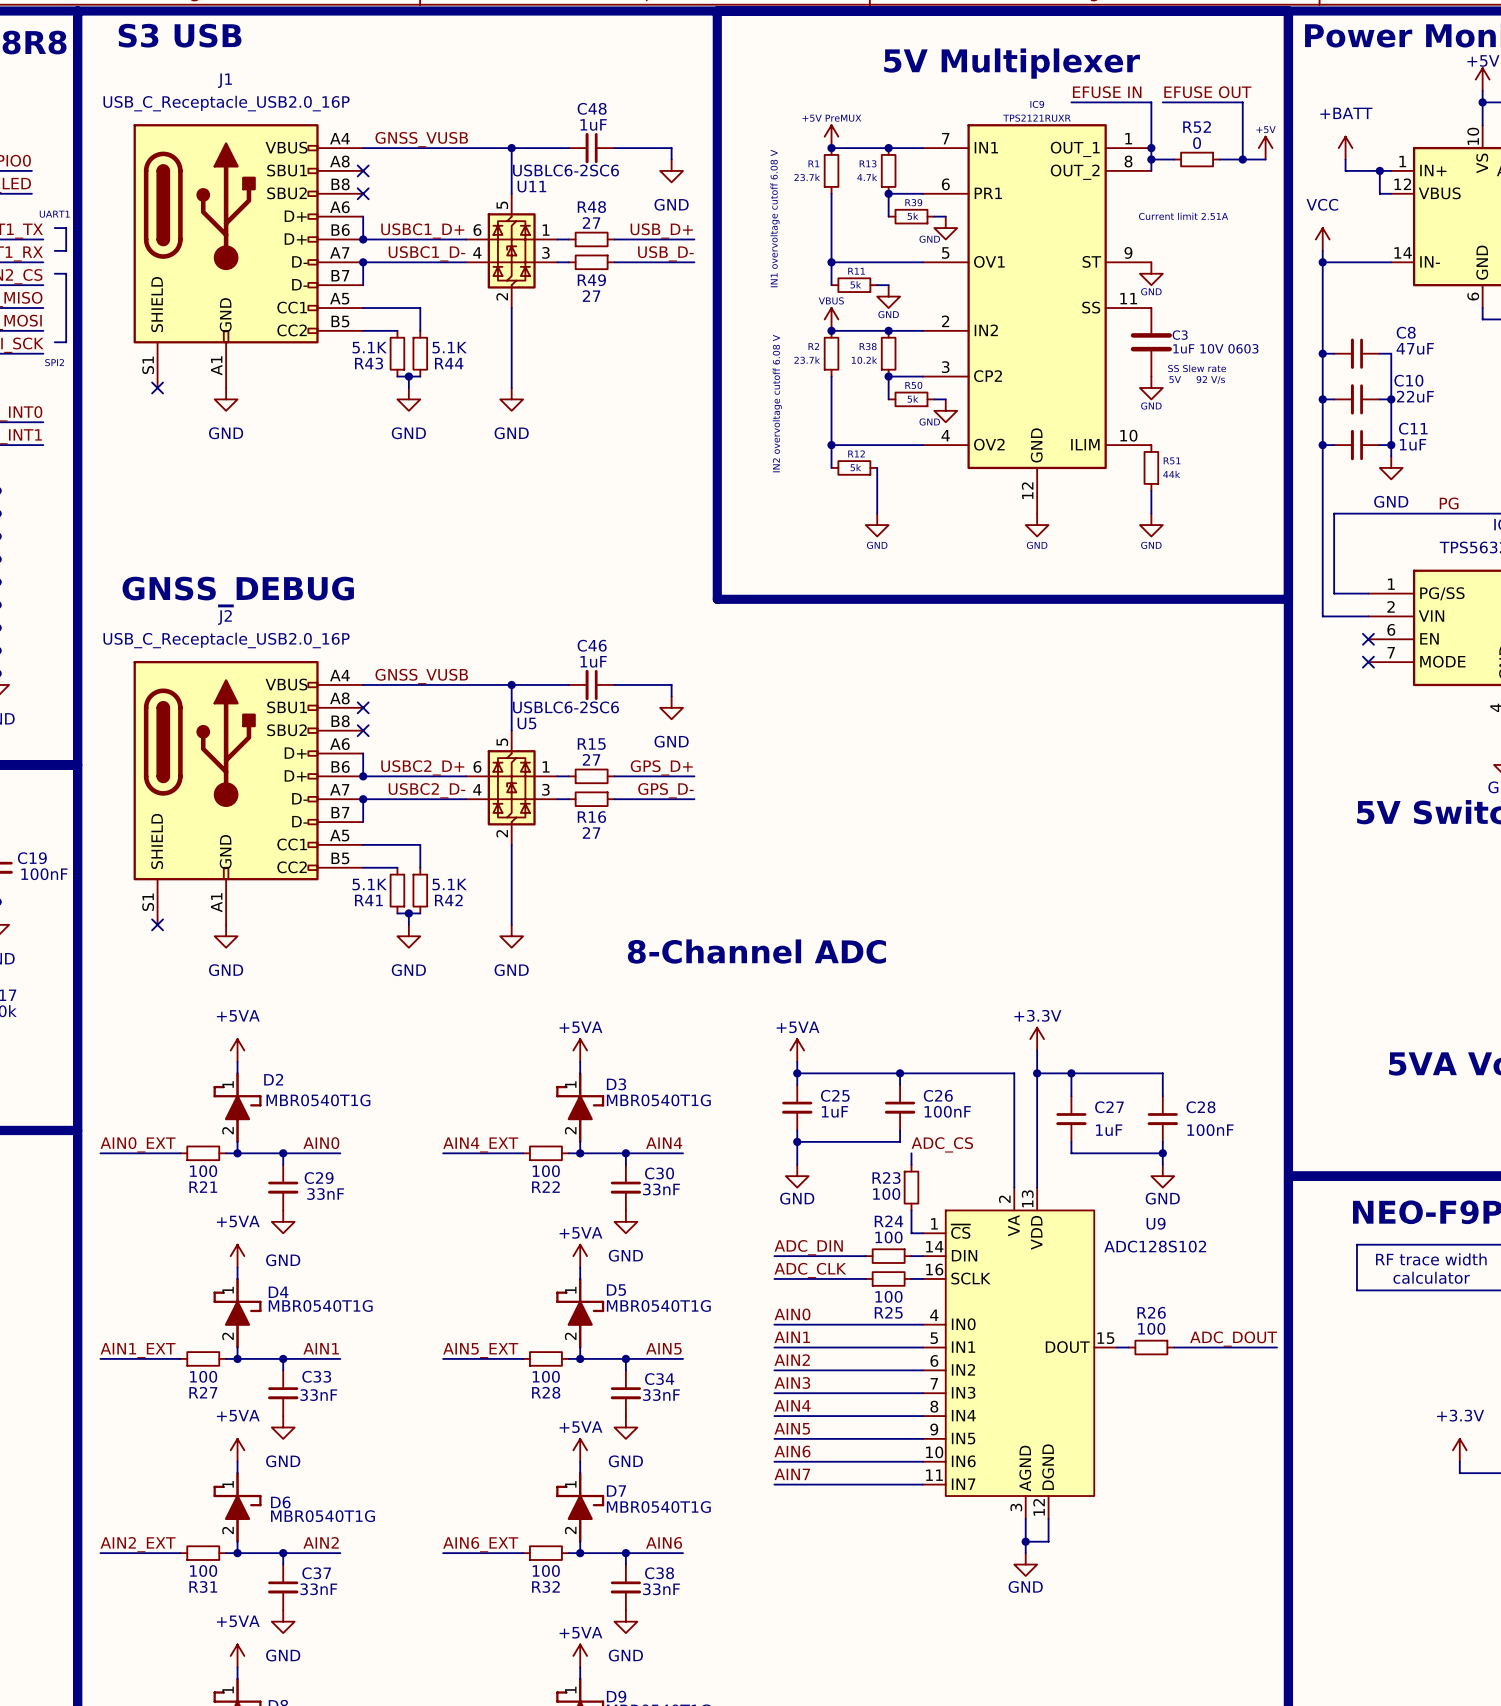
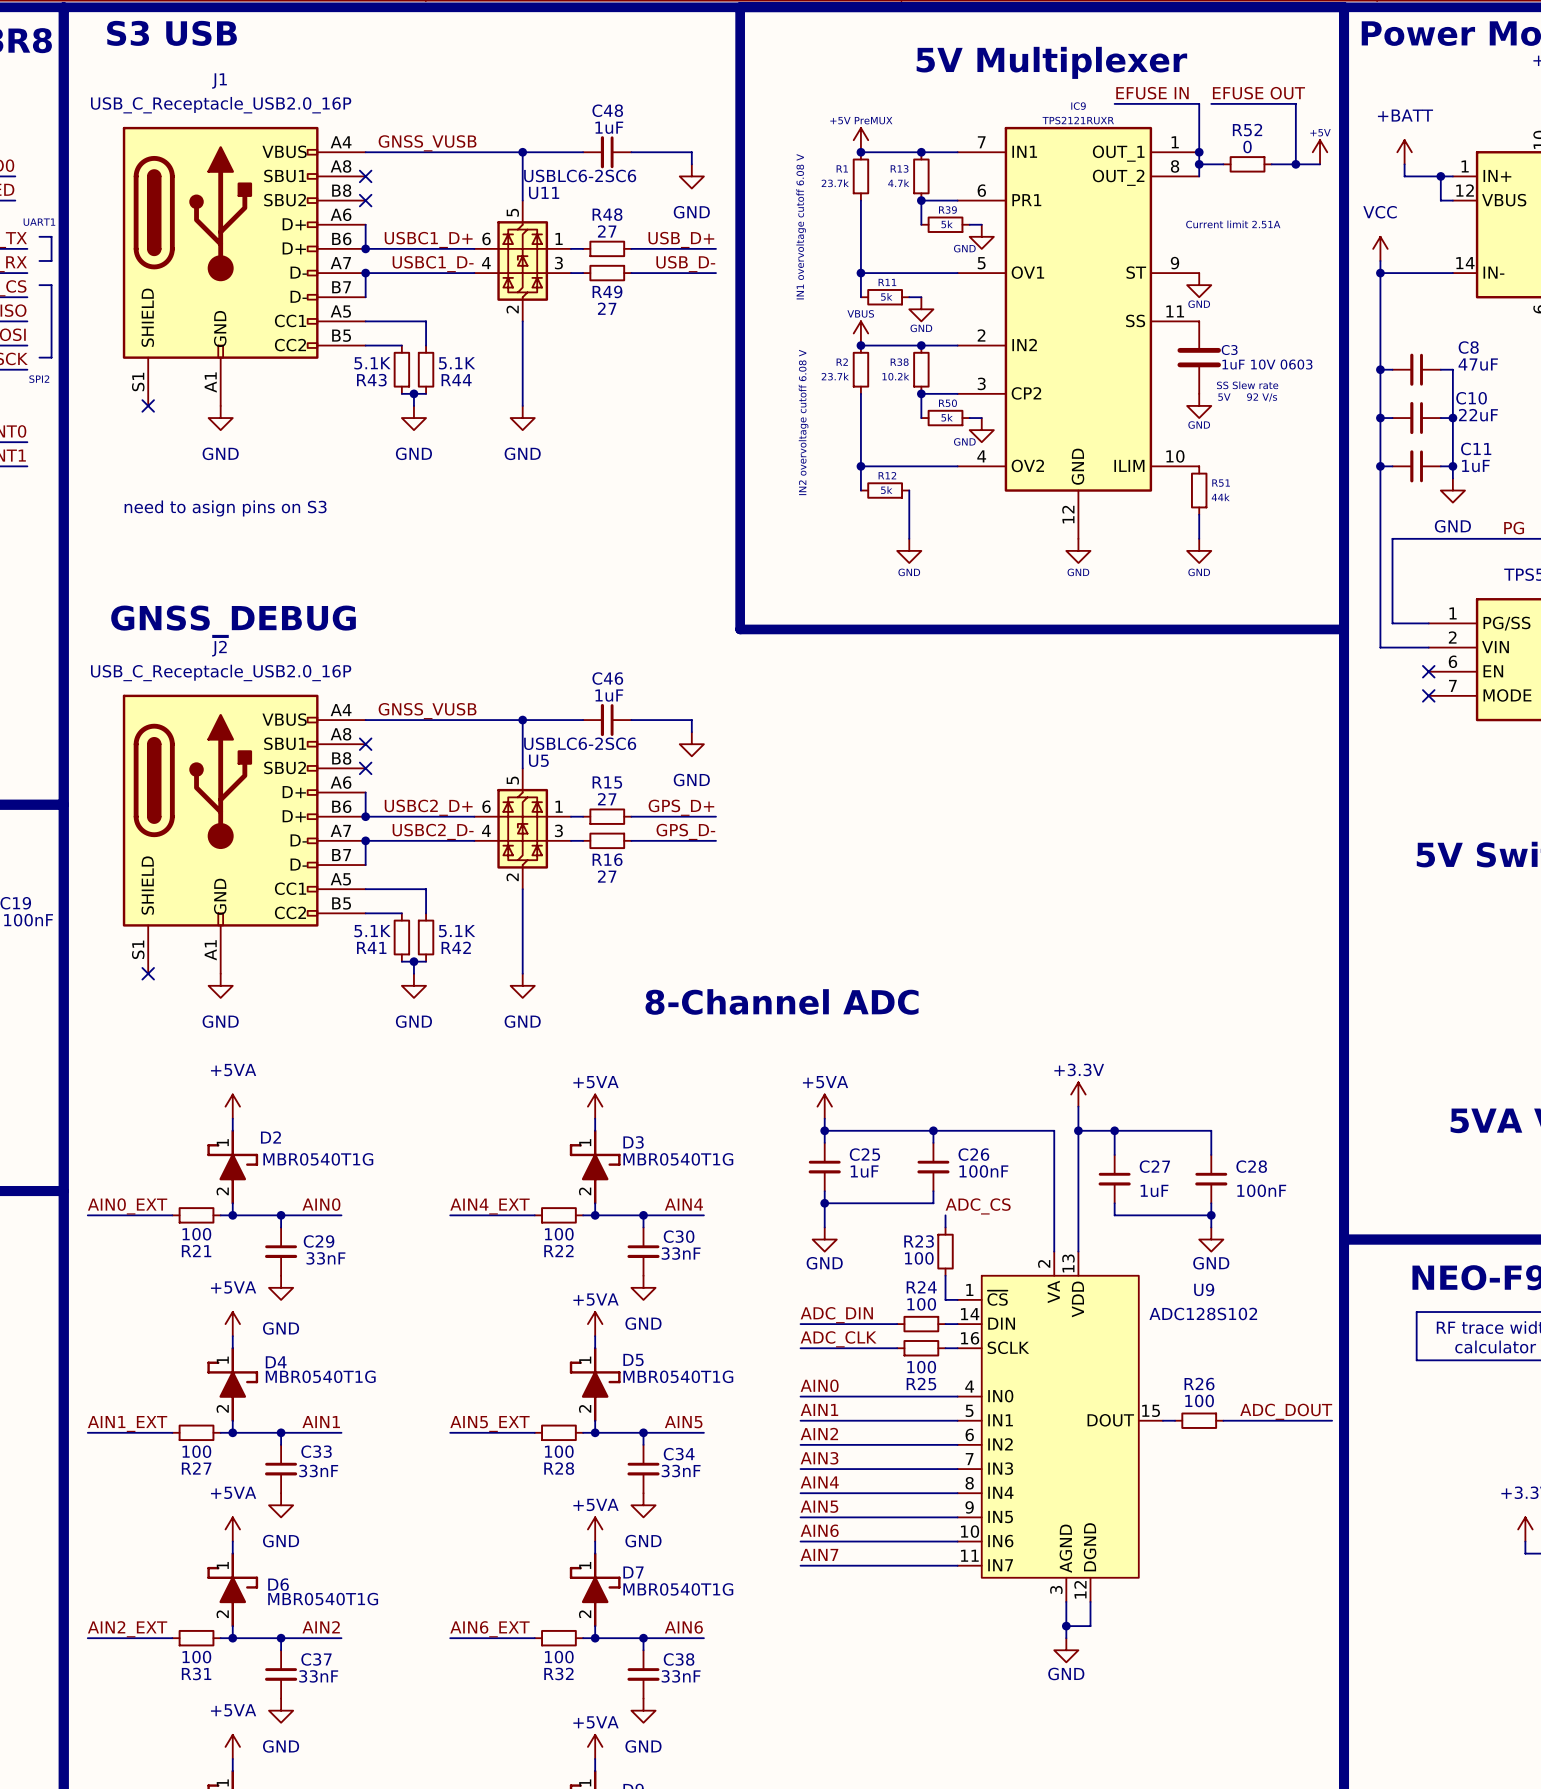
text: none -> need to asign pins on S3 (225, 508)

